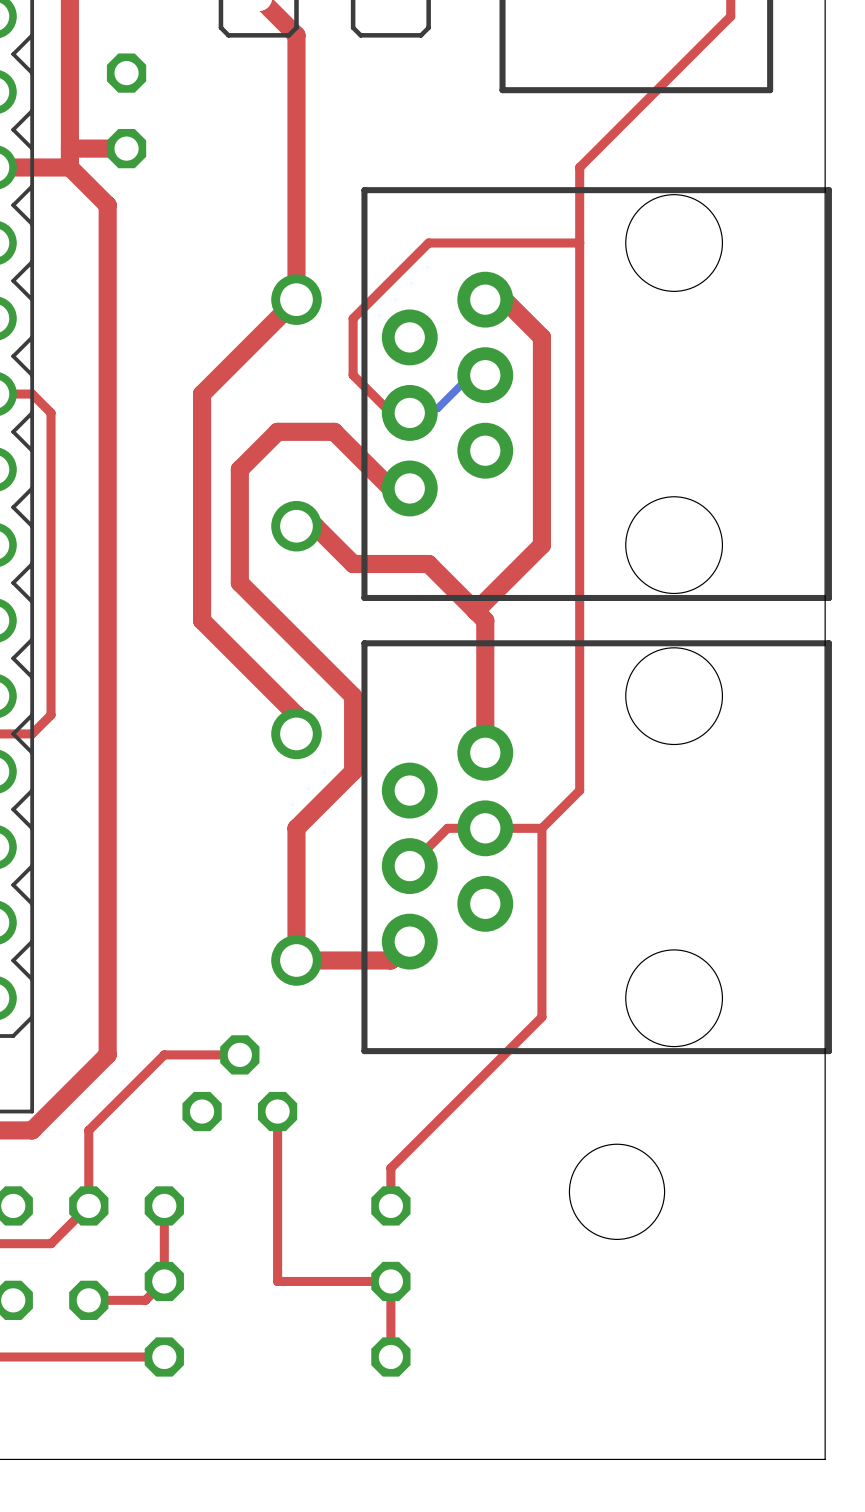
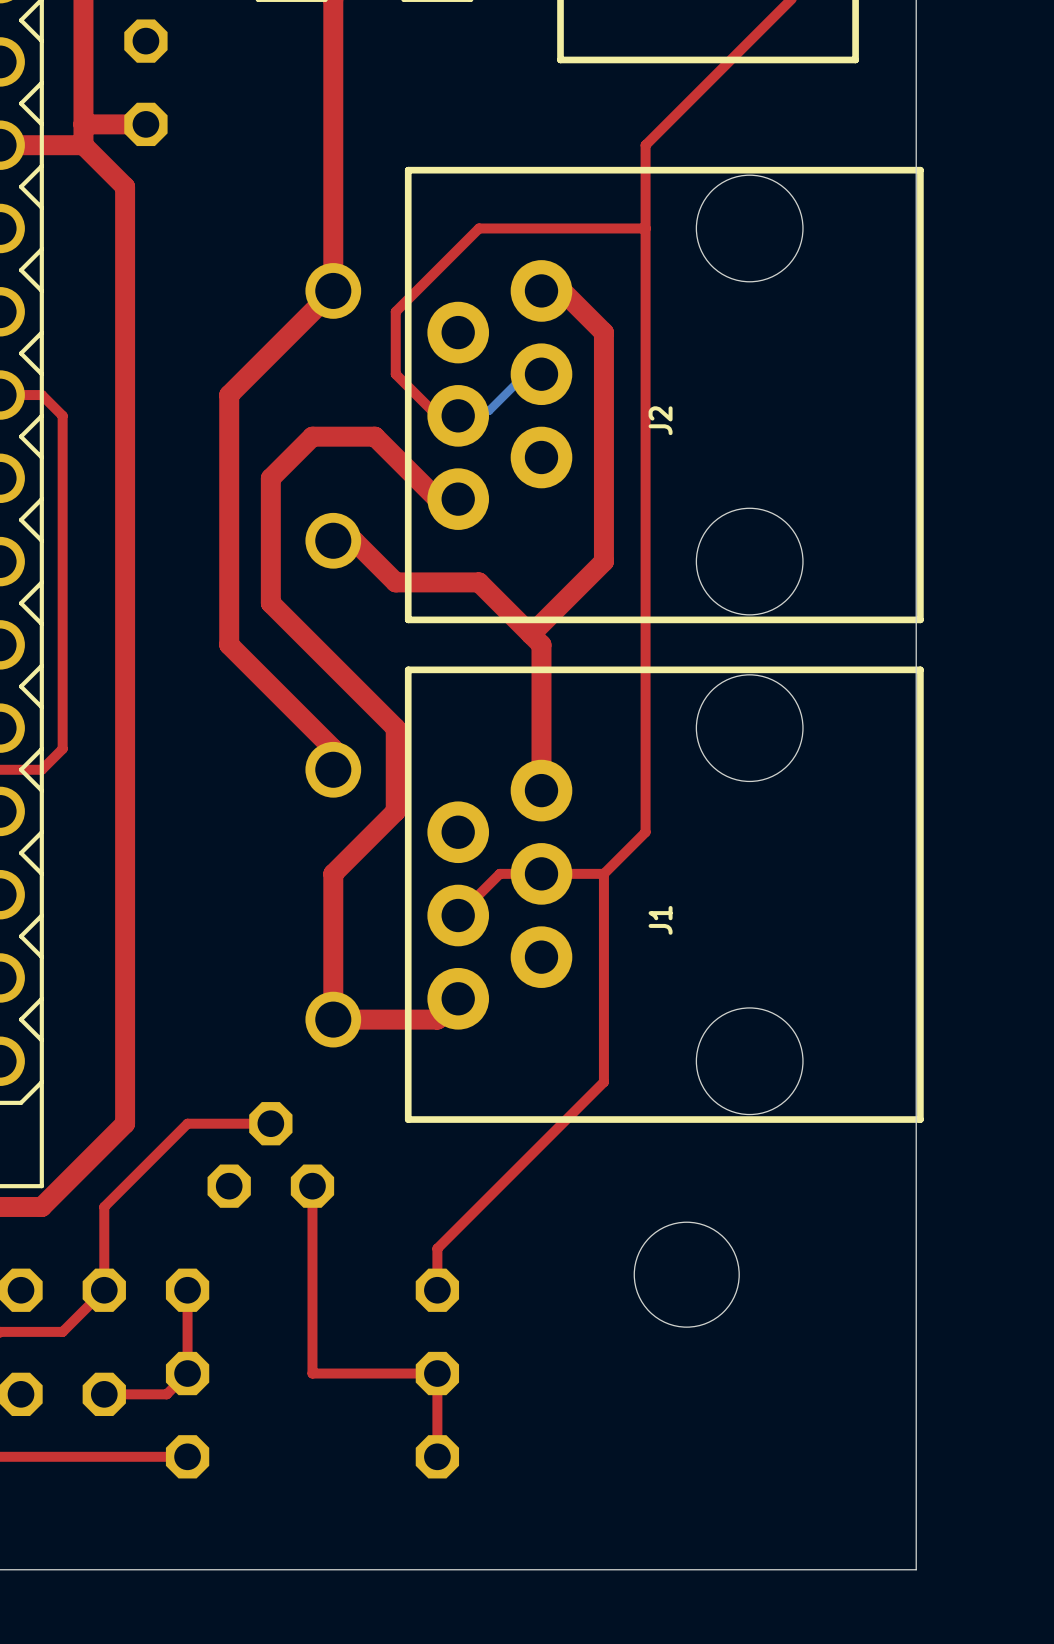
J2 name: none -> J2 (660, 420)
J1 name: none -> J1 (660, 920)

